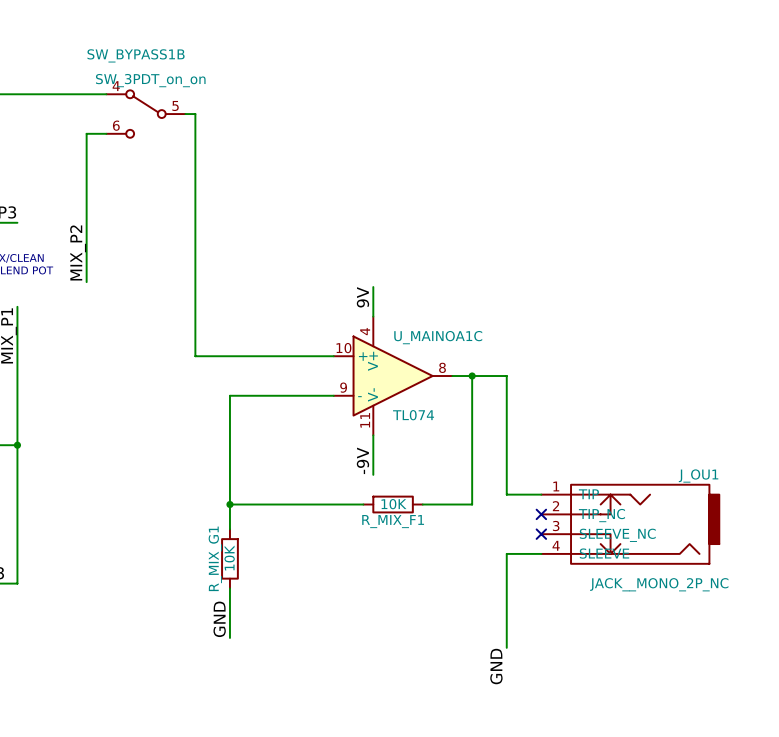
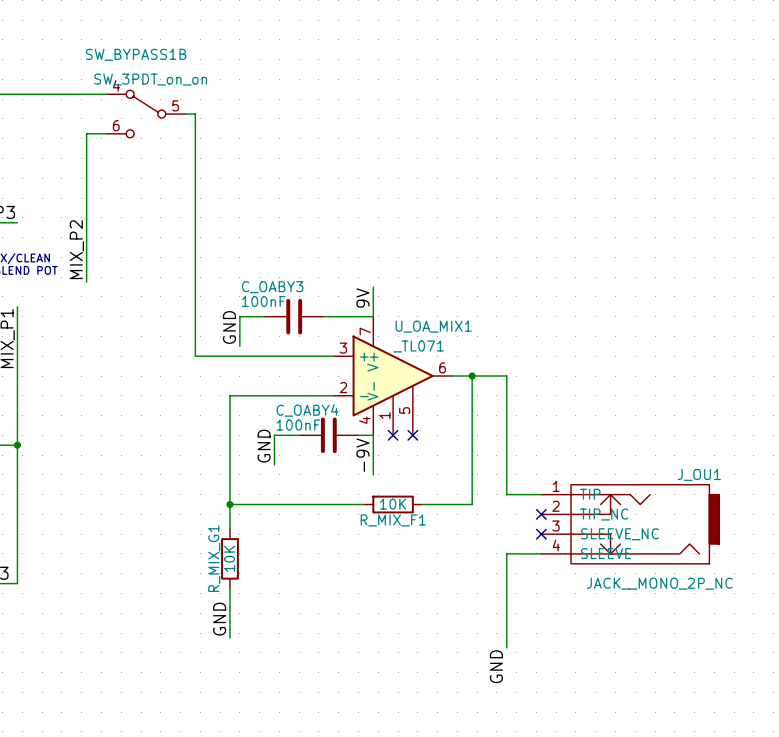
wire: none -> (264, 316) (239, 316) (239, 346)
C_OABY3: none -> 100nF (294, 316)
wire: none -> (323, 316) (373, 316)
label: none -> GND (229, 327)
U_MAINOA1C: TL074 (393, 376) -> none
U_OA_MIX1: none -> _TL071 (393, 376)
wire: none -> (299, 435) (274, 435) (274, 464)
C_OABY4: none -> 100nF (328, 435)
wire: none -> (358, 435) (373, 435)
no-connect mark: none -> (393, 435)
no-connect mark: none -> (412, 435)
label: none -> GND (264, 446)

